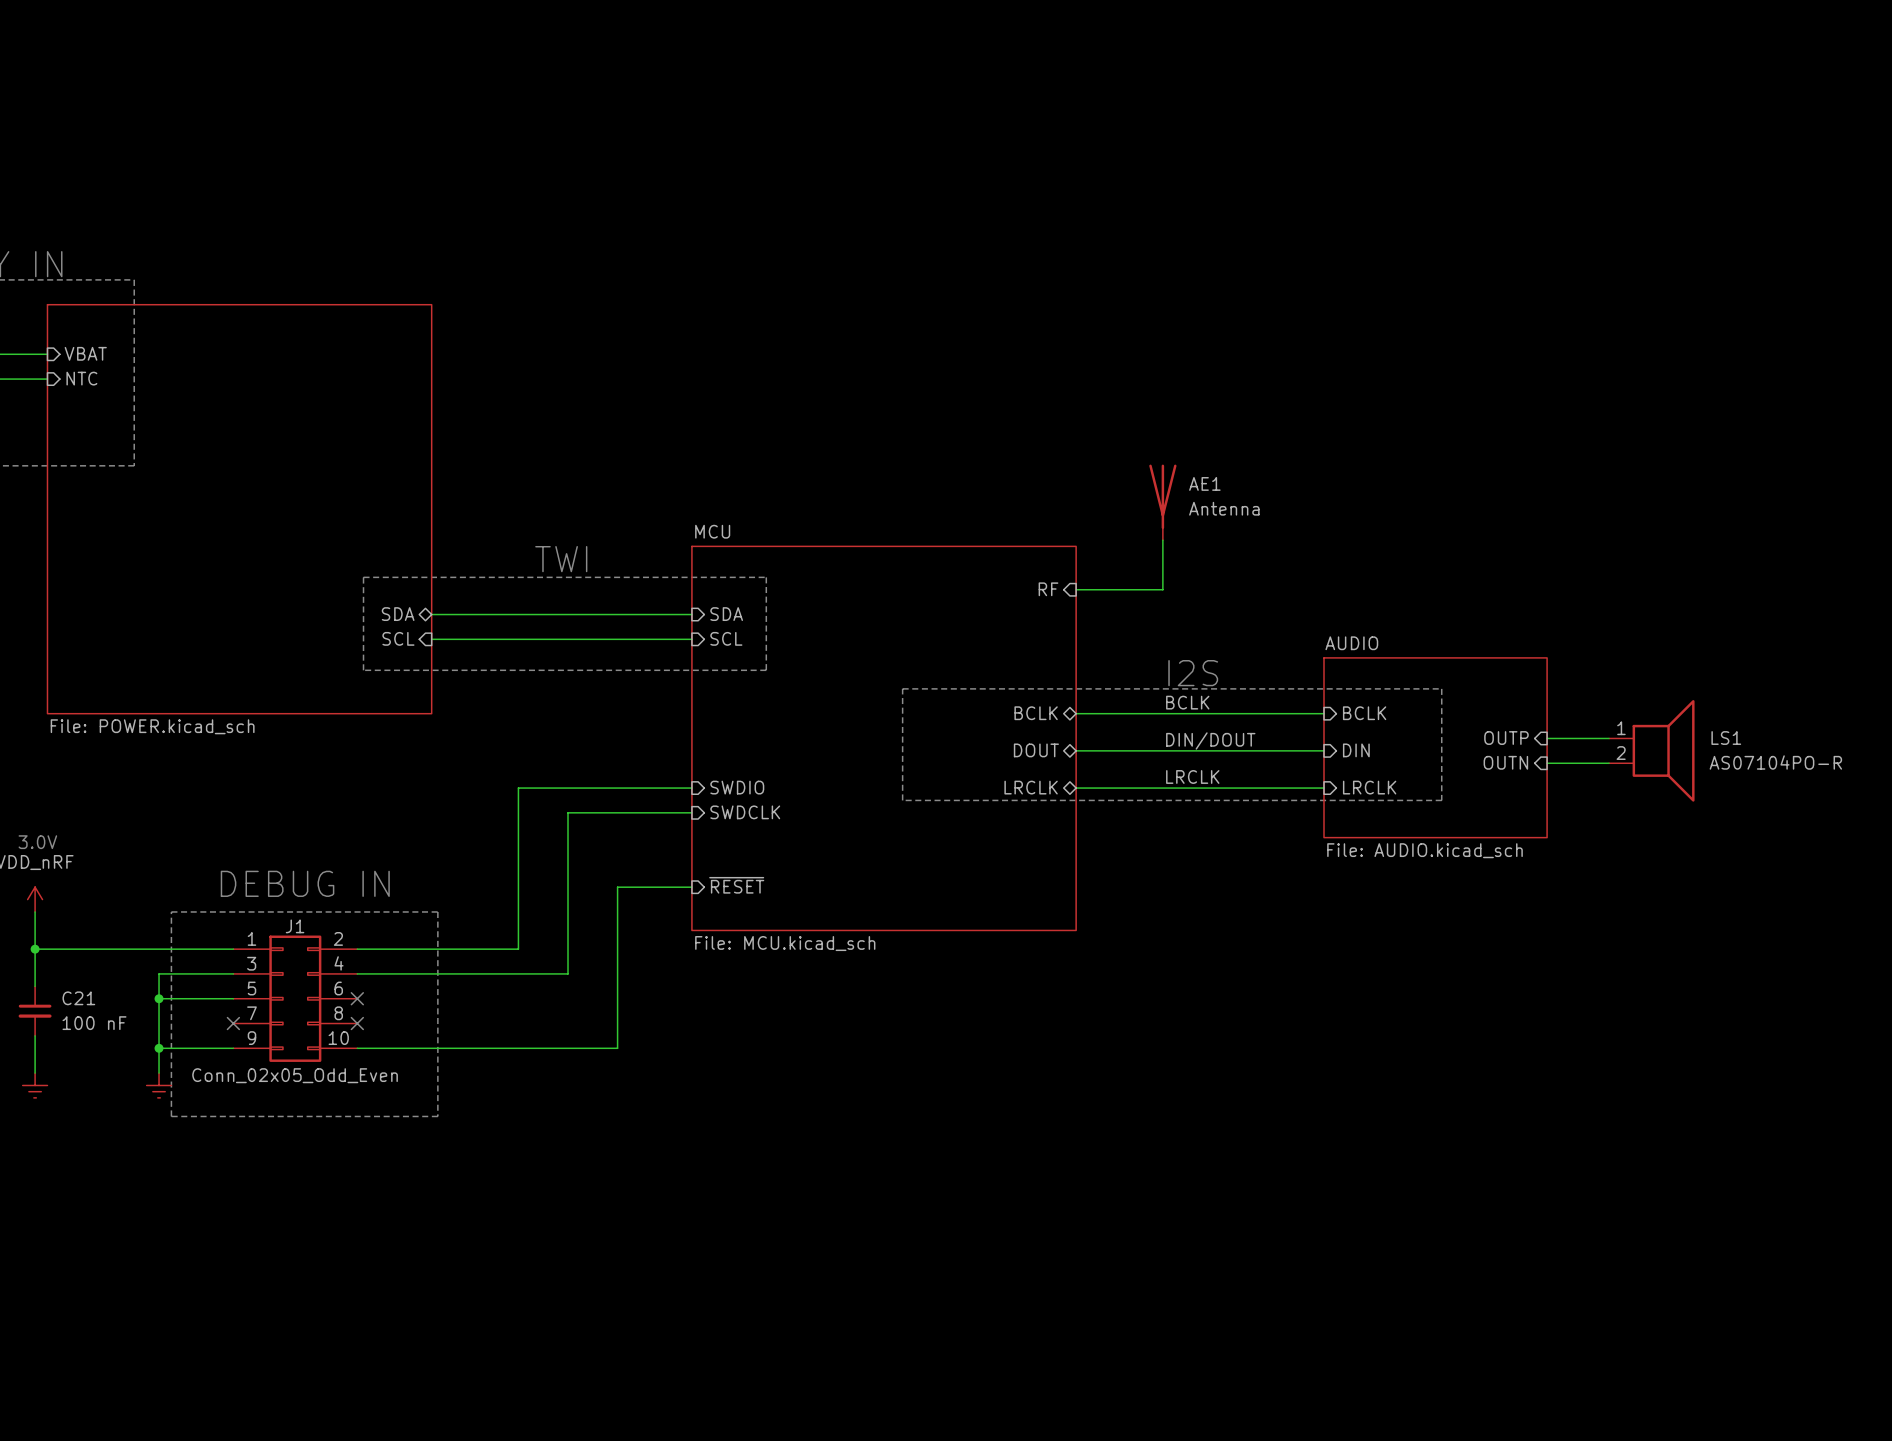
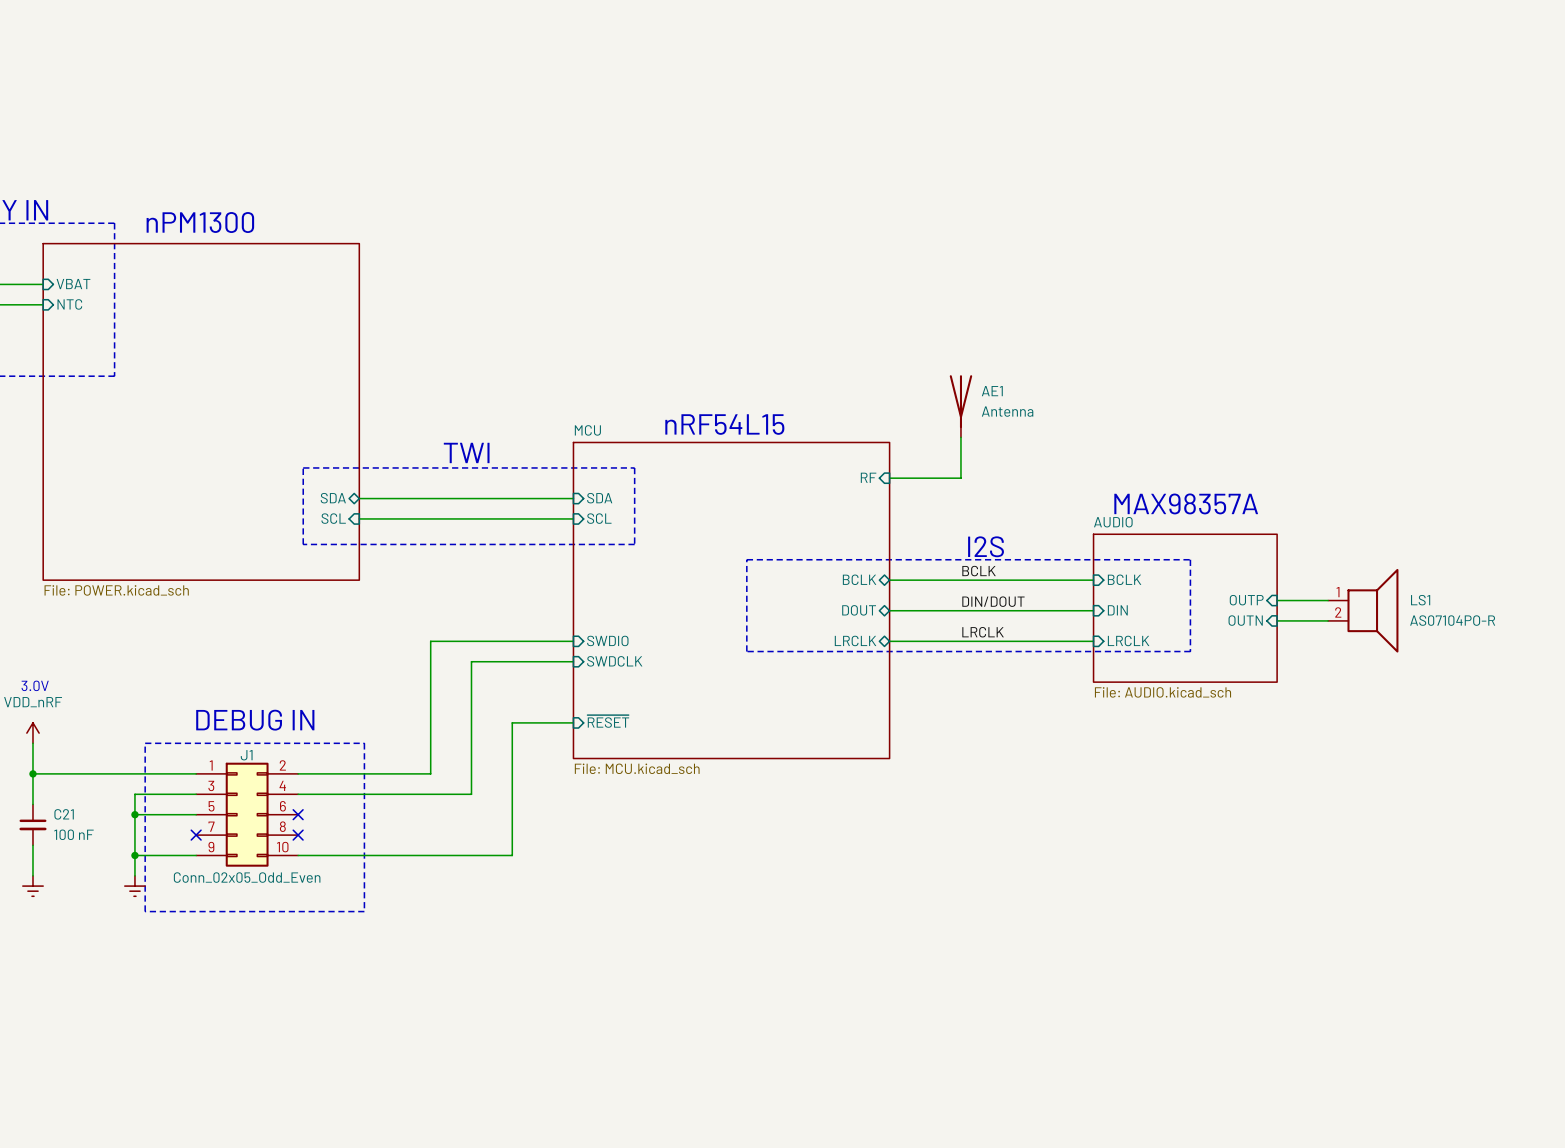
text: none -> nPM1300 (200, 222)
text: none -> nRF54L15 (724, 424)
text: none -> MAX98357A (1186, 503)

